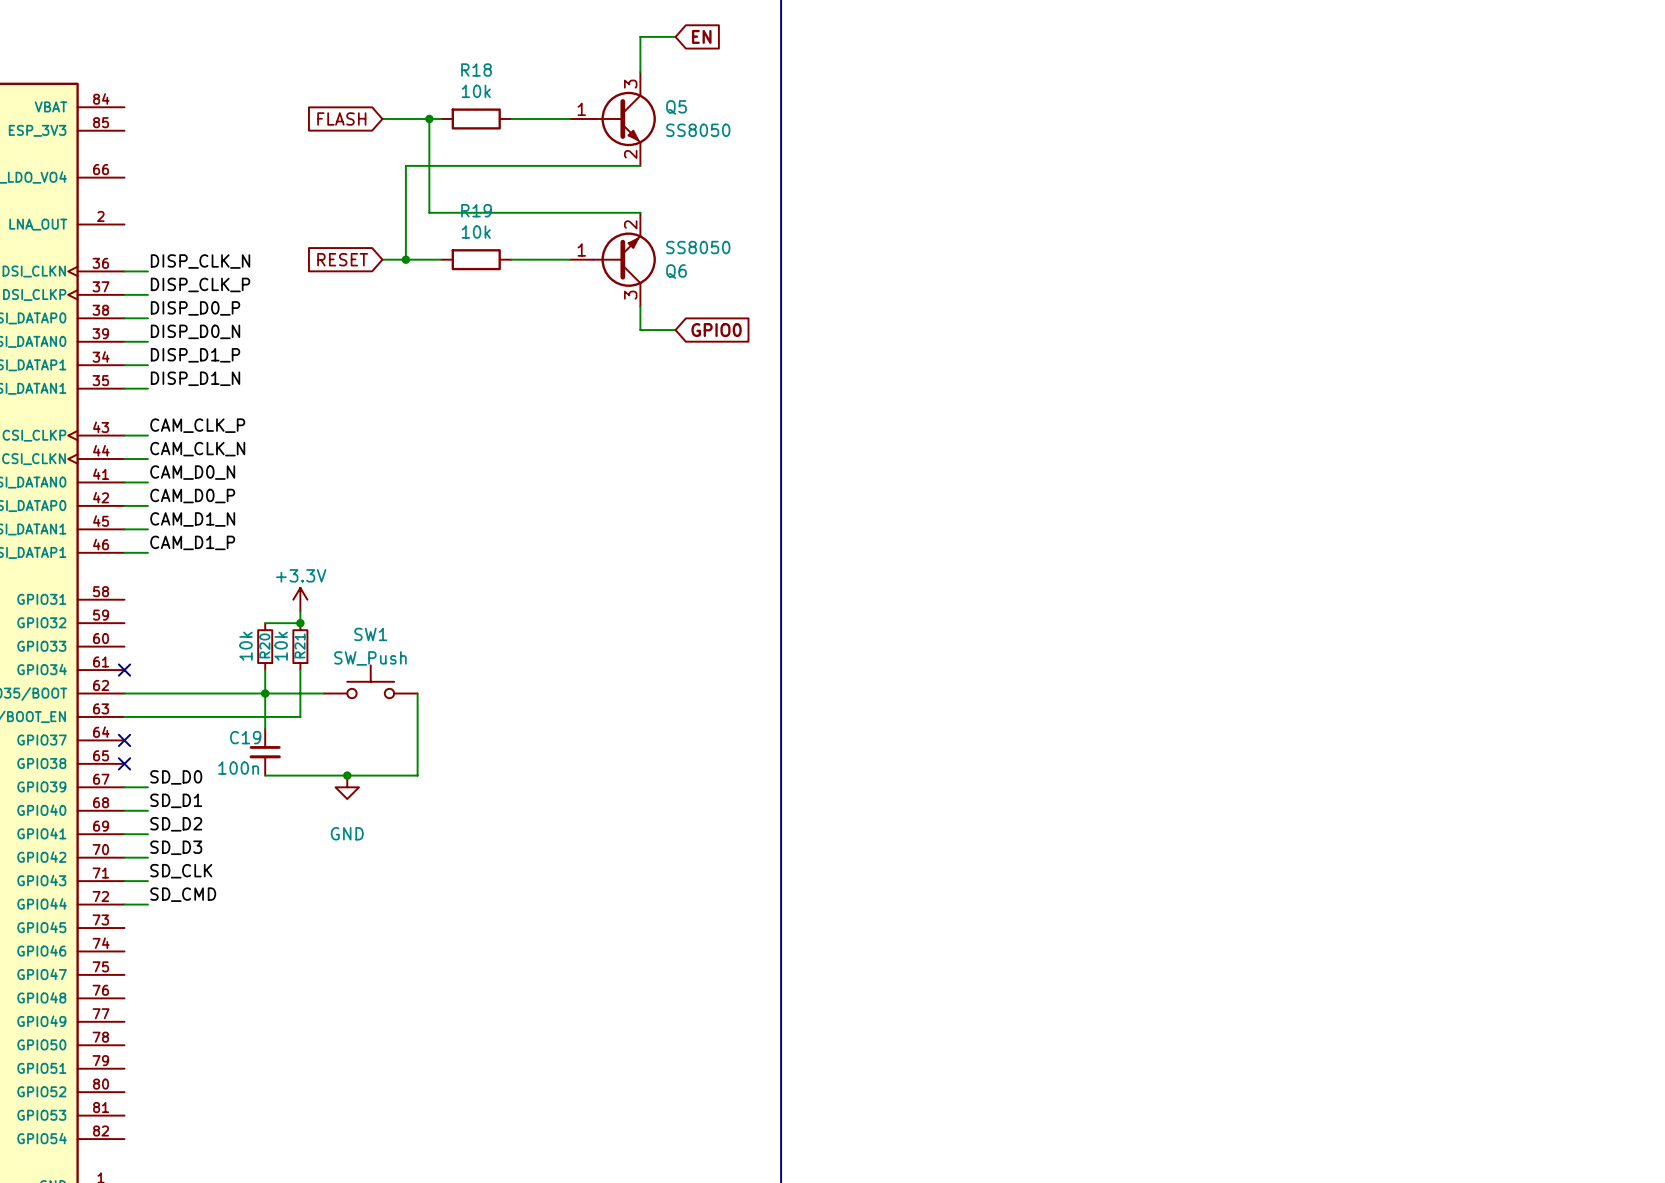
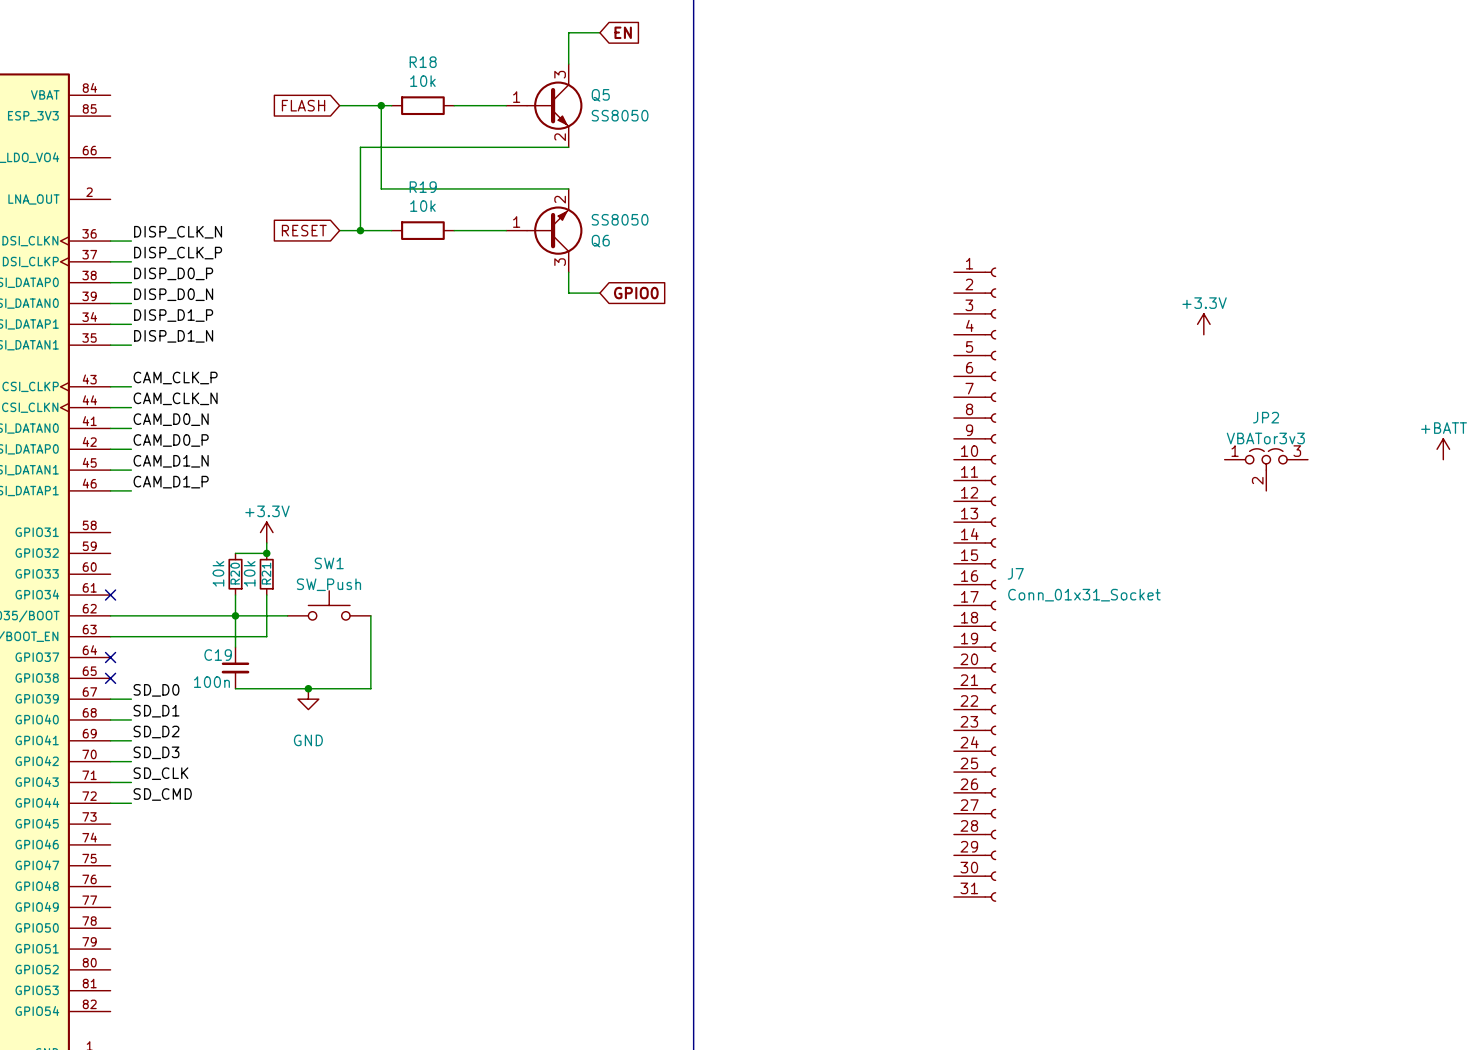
power symbol: none -> +3.3V (1203, 324)
power symbol: none -> +BATT (1443, 449)
JP2: none -> VBATor3v3 (1266, 469)
J7: none -> Conn_01x31_Socket (975, 584)

